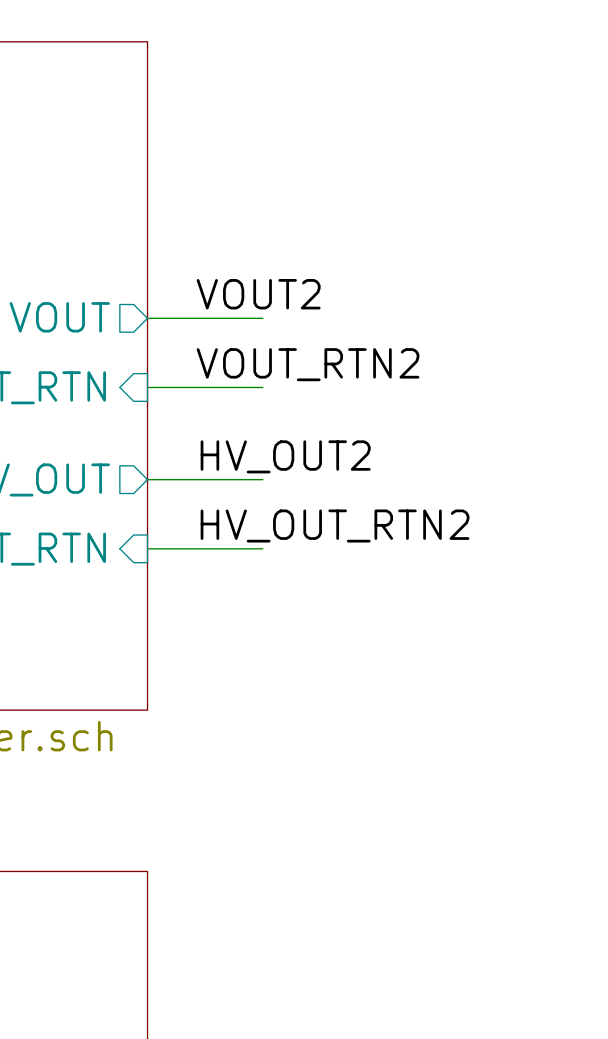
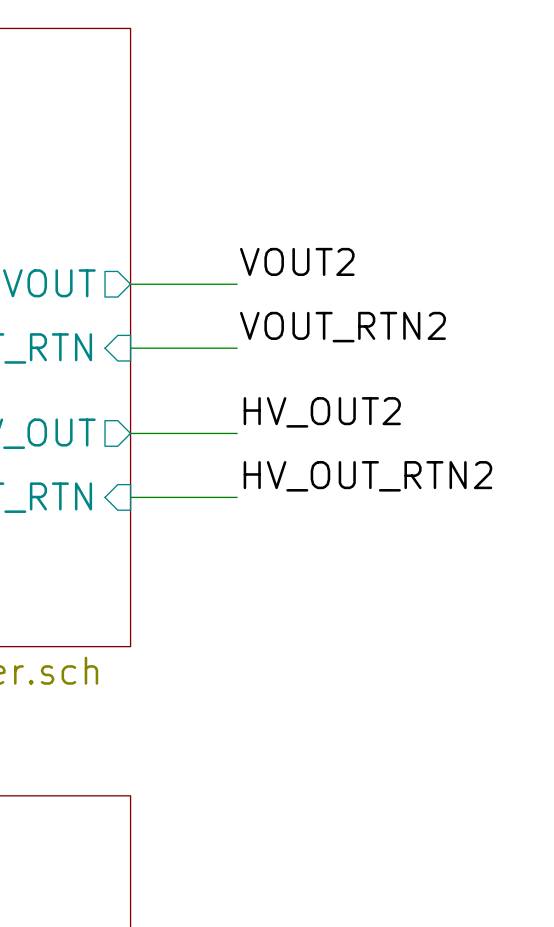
label position: VOUT2 (258, 294) -> VOUT2 (297, 261)
label position: VOUT_RTN2 (308, 364) -> VOUT_RTN2 (342, 327)
label position: HV_OUT2 (285, 456) -> HV_OUT2 (322, 412)
label position: HV_OUT_RTN2 (335, 526) -> HV_OUT_RTN2 (367, 476)

